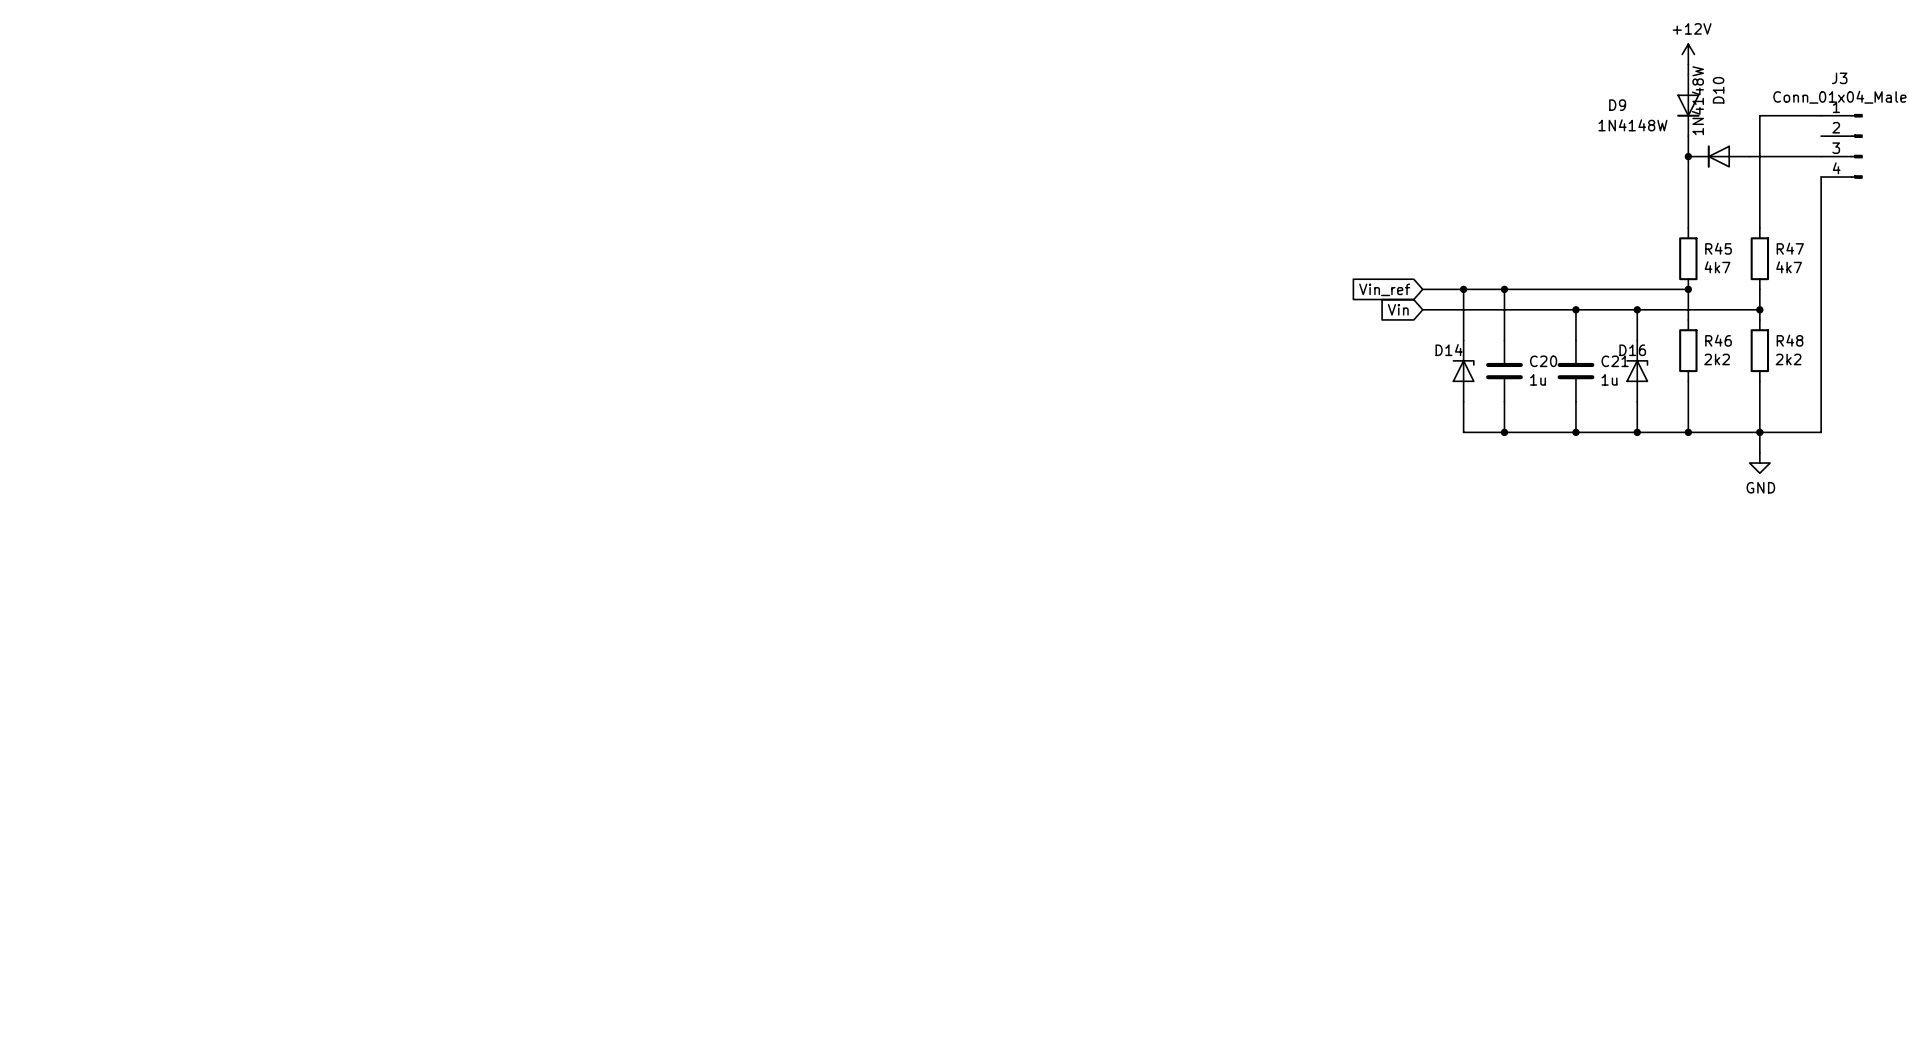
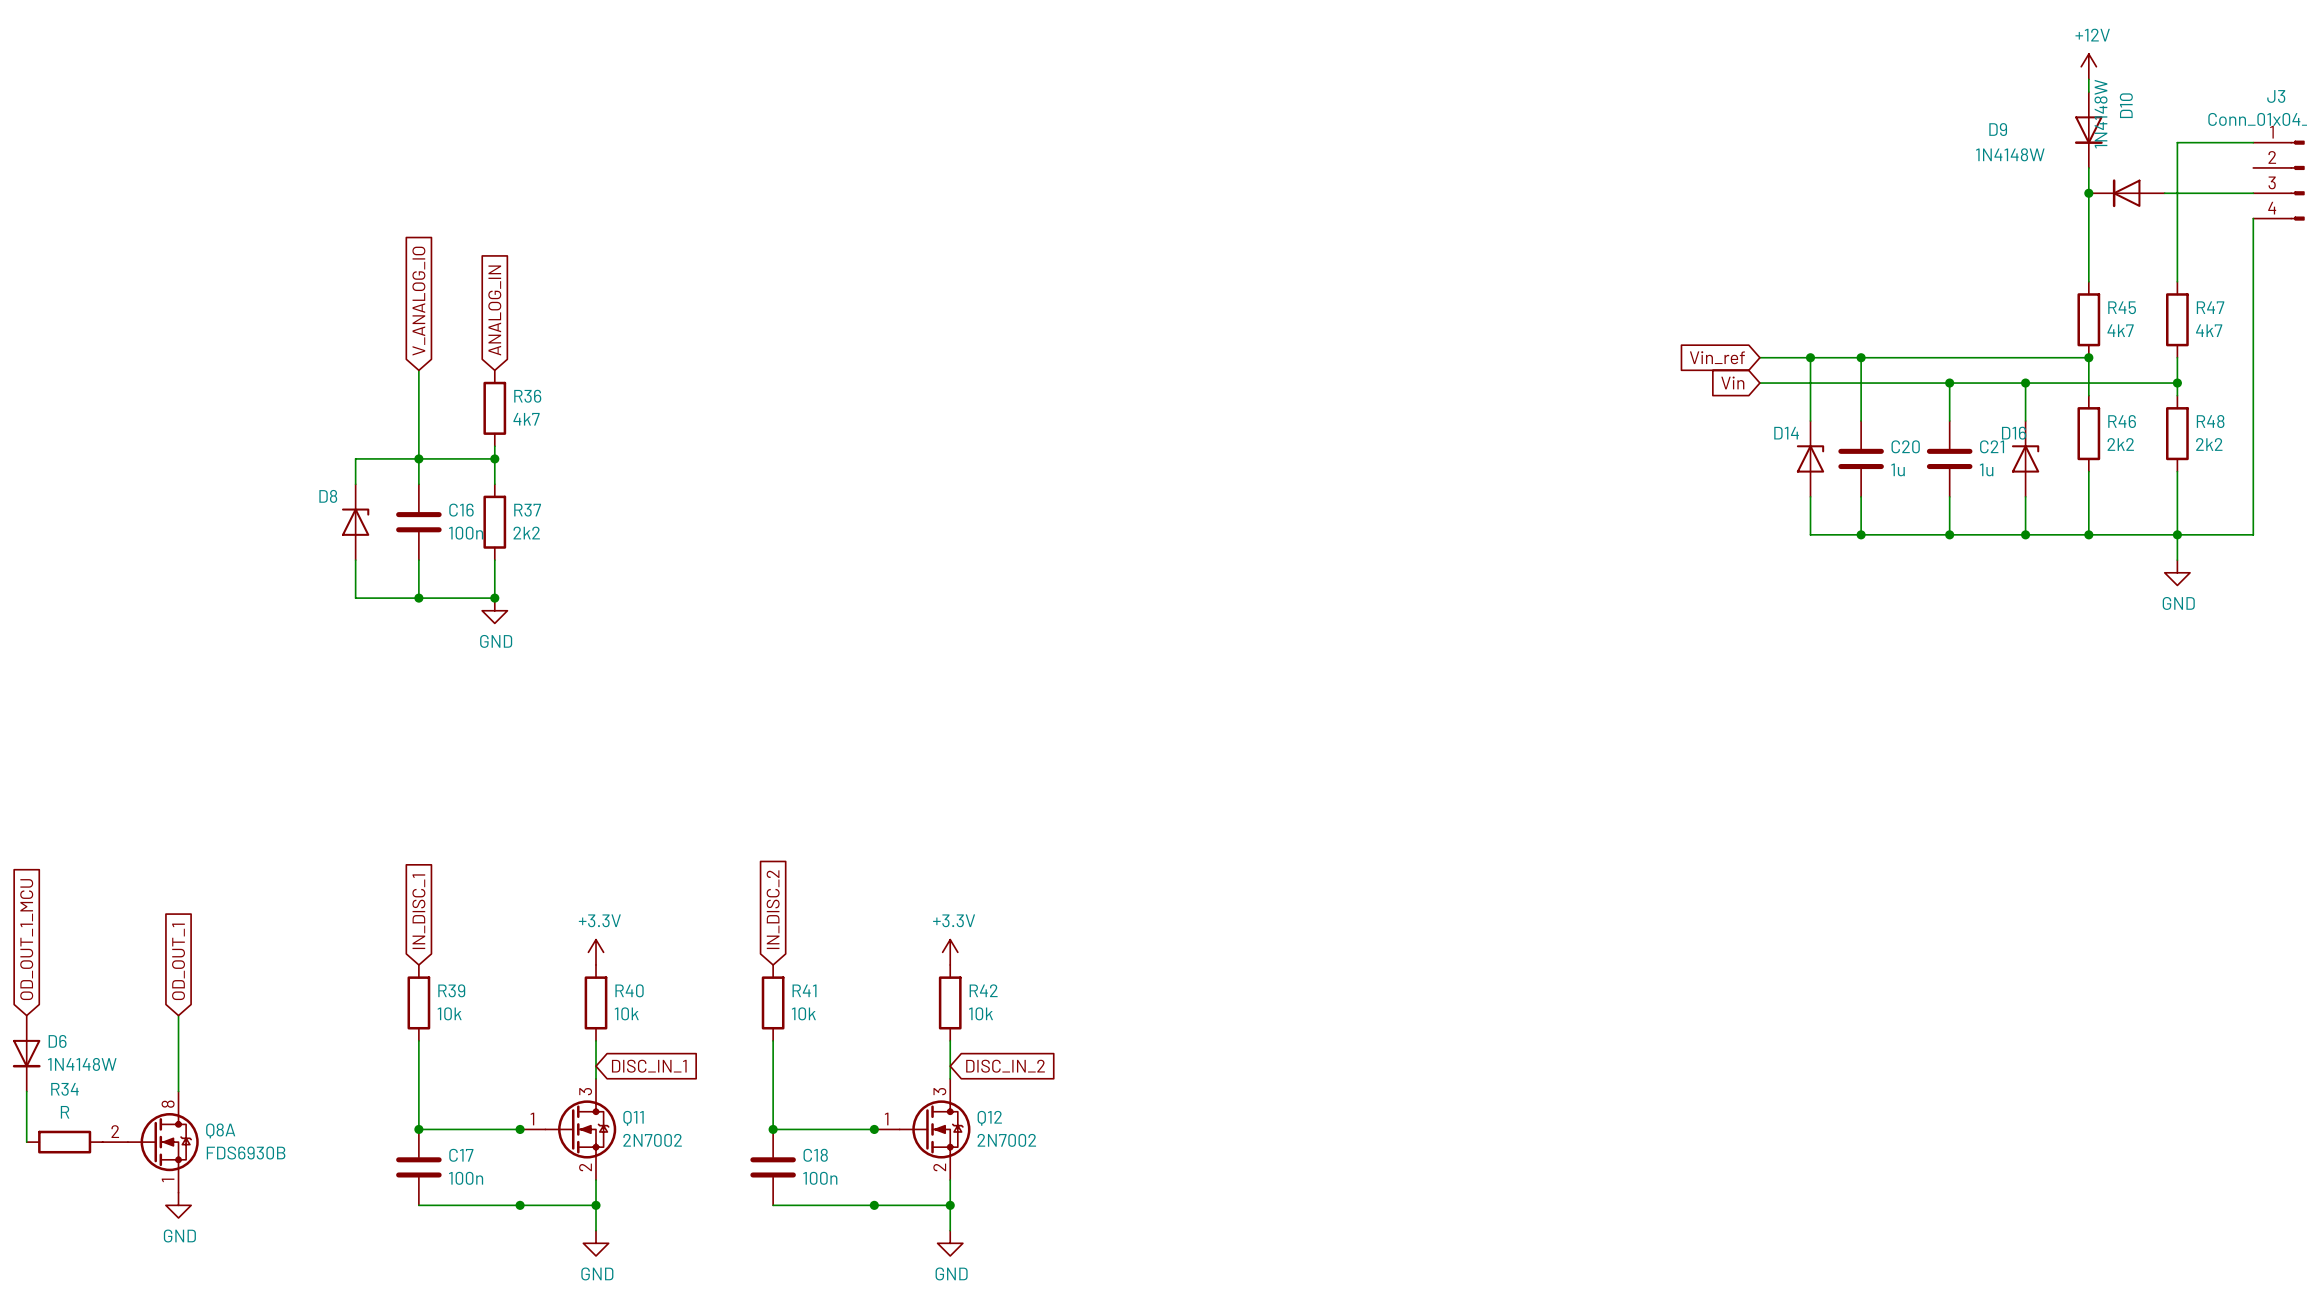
global label: none -> V_ANALOG_IO (418, 301)
global label: none -> ANALOG_IN (494, 310)
wire: none -> (418, 370) (418, 484)
R36: none -> 4k7 (494, 408)
wire: none -> (494, 446) (494, 484)
junction: none -> (418, 458)
wire: none -> (494, 458) (355, 458) (355, 484)
junction: none -> (494, 458)
D8: none -> (355, 522)
C16: none -> 100n (418, 522)
R37: none -> 2k2 (494, 522)
wire: none -> (355, 560) (355, 598) (494, 598) (494, 560)
wire: none -> (418, 560) (418, 598)
junction: none -> (418, 598)
junction: none -> (494, 598)
power symbol: none -> GND (494, 610)
global label: none -> IN_DISC_1 (418, 911)
global label: none -> IN_DISC_2 (773, 909)
global label: none -> OD_OUT_1_MCU (26, 939)
power symbol: none -> +3.3V (596, 952)
power symbol: none -> +3.3V (950, 952)
global label: none -> OD_OUT_1 (178, 961)
R39: none -> 10k (418, 1002)
R40: none -> 10k (596, 1002)
R41: none -> 10k (773, 1002)
R42: none -> 10k (950, 1002)
wire: none -> (178, 1015) (178, 1091)
wire: none -> (418, 1040) (418, 1129) (520, 1129)
wire: none -> (596, 1040) (596, 1078)
wire: none -> (773, 1040) (773, 1129) (874, 1129)
wire: none -> (950, 1040) (950, 1078)
D6: none -> 1N4148W (26, 1053)
global label: none -> DISC_IN_1 (649, 1066)
global label: none -> DISC_IN_2 (1005, 1066)
wire: none -> (26, 1091) (26, 1142)
junction: none -> (418, 1129)
junction: none -> (520, 1129)
Q11: none -> 2N7002 (568, 1129)
junction: none -> (773, 1129)
junction: none -> (874, 1129)
Q12: none -> 2N7002 (922, 1129)
R34: none -> R (64, 1142)
Q8A: none -> FDS6930B (150, 1142)
C17: none -> 100n (418, 1167)
C18: none -> 100n (773, 1167)
wire: none -> (596, 1180) (596, 1230)
wire: none -> (950, 1180) (950, 1230)
power symbol: none -> GND (178, 1205)
wire: none -> (418, 1205) (596, 1205)
junction: none -> (520, 1205)
junction: none -> (596, 1205)
wire: none -> (773, 1205) (950, 1205)
junction: none -> (874, 1205)
junction: none -> (950, 1205)
power symbol: none -> GND (596, 1243)
power symbol: none -> GND (950, 1243)

